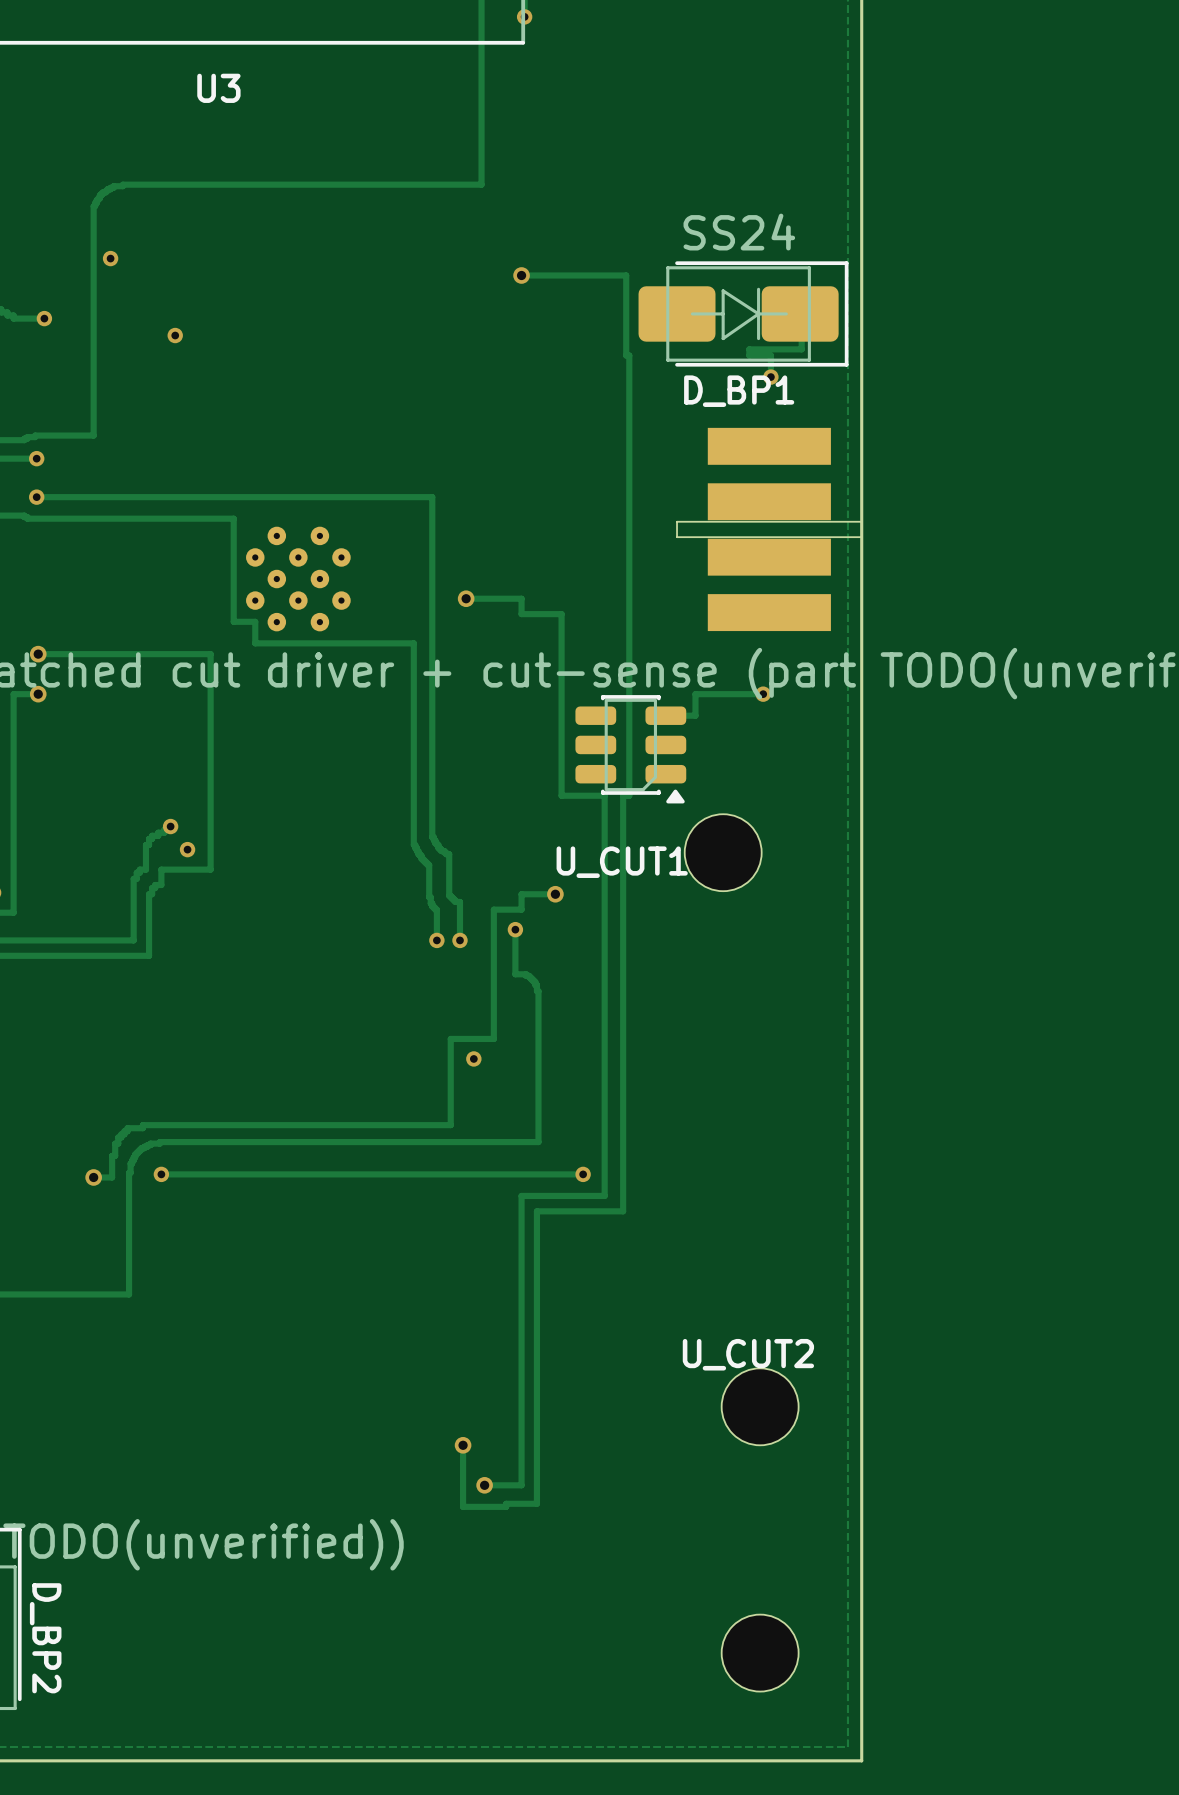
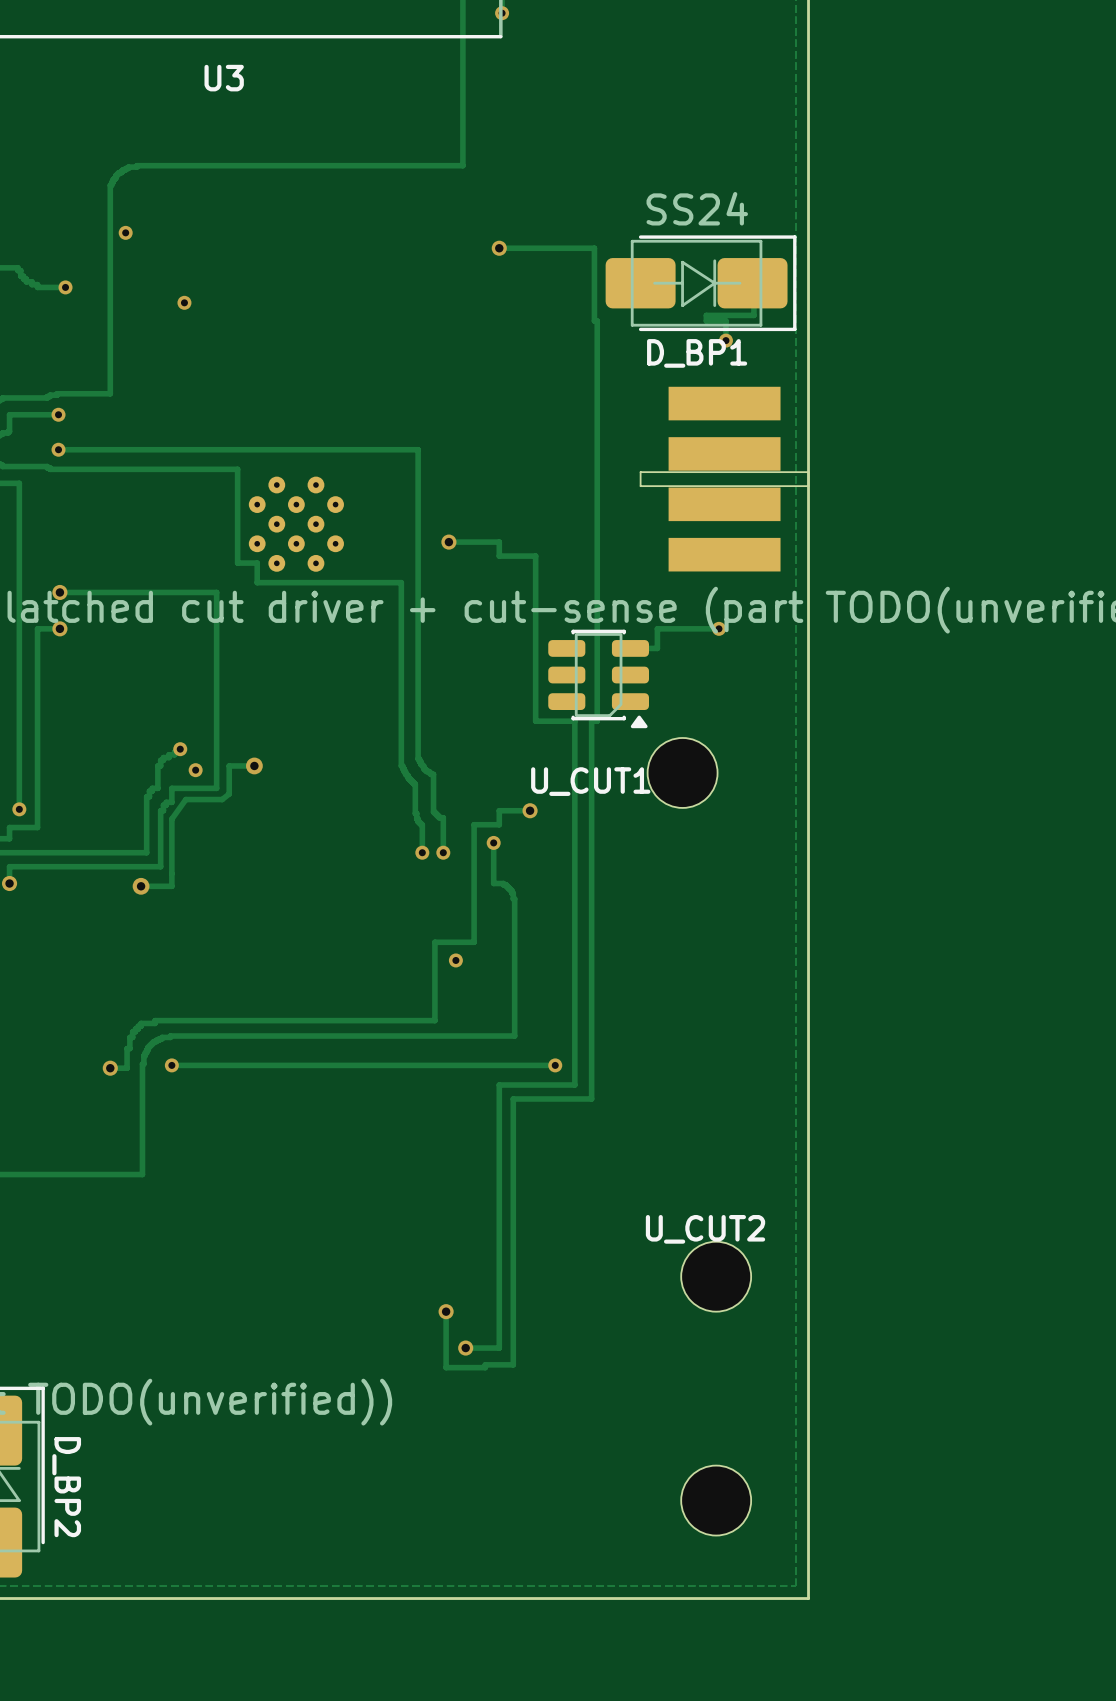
track: none -> (254, 765) (229, 765) (229, 793) (222, 799) (185, 799) (171, 819) (171, 886) (141, 886)
via: none -> (254, 765)
via: none -> (141, 886)

